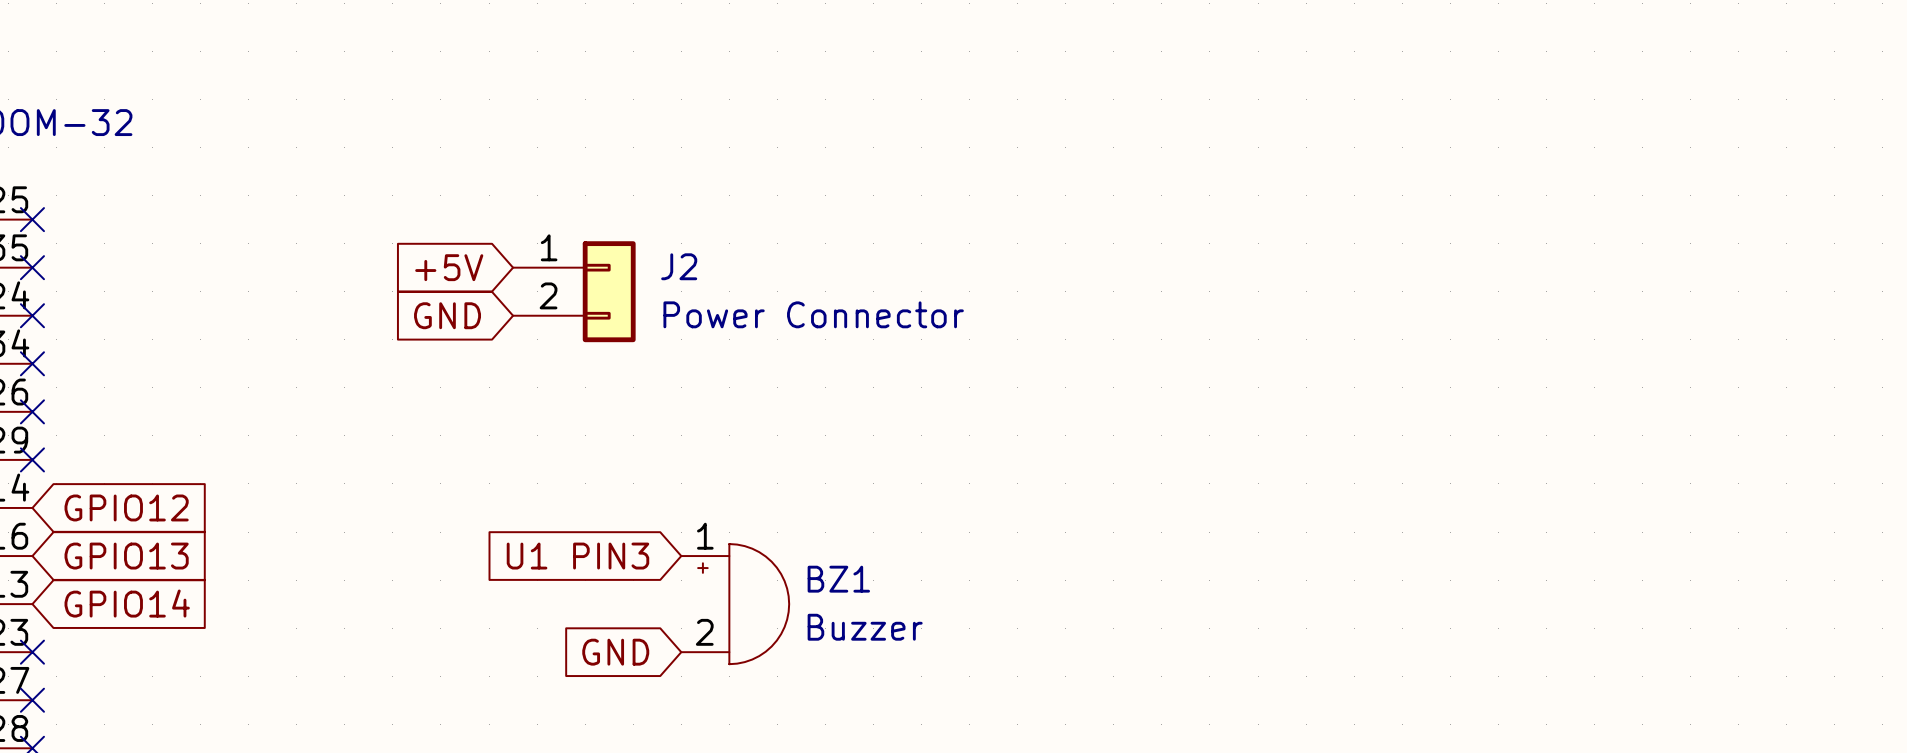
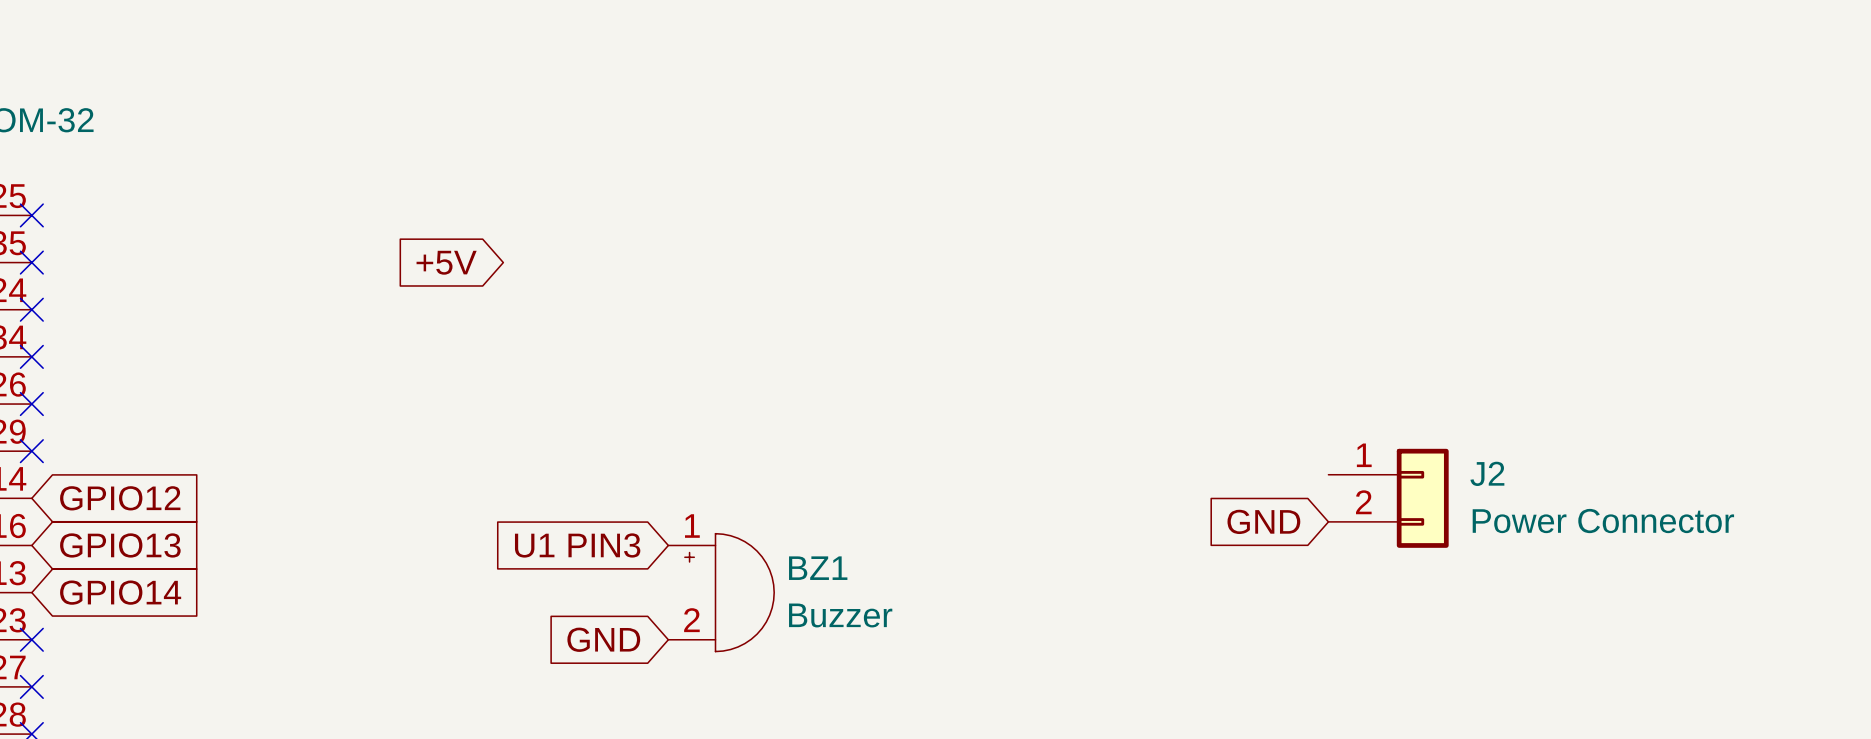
J2 position: (574, 291) -> (1388, 498)
global label: GND (447, 315) -> none
global label: none -> GND (1263, 521)

